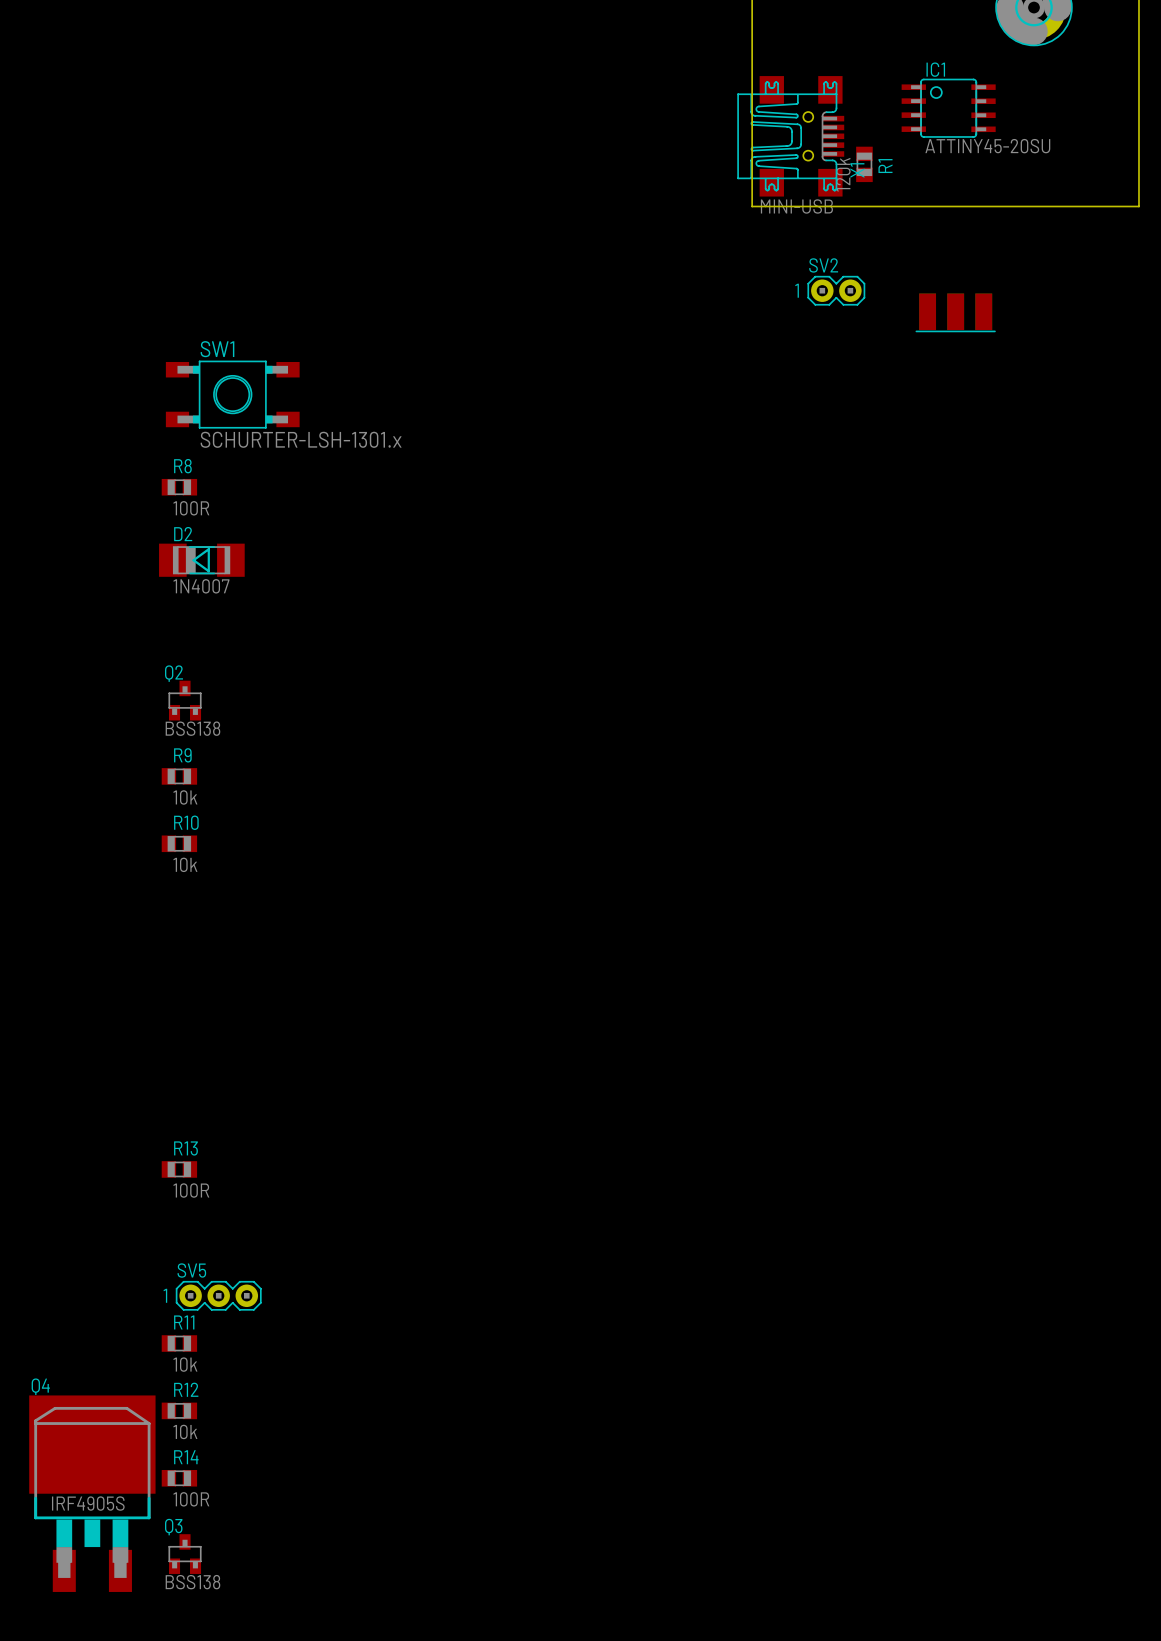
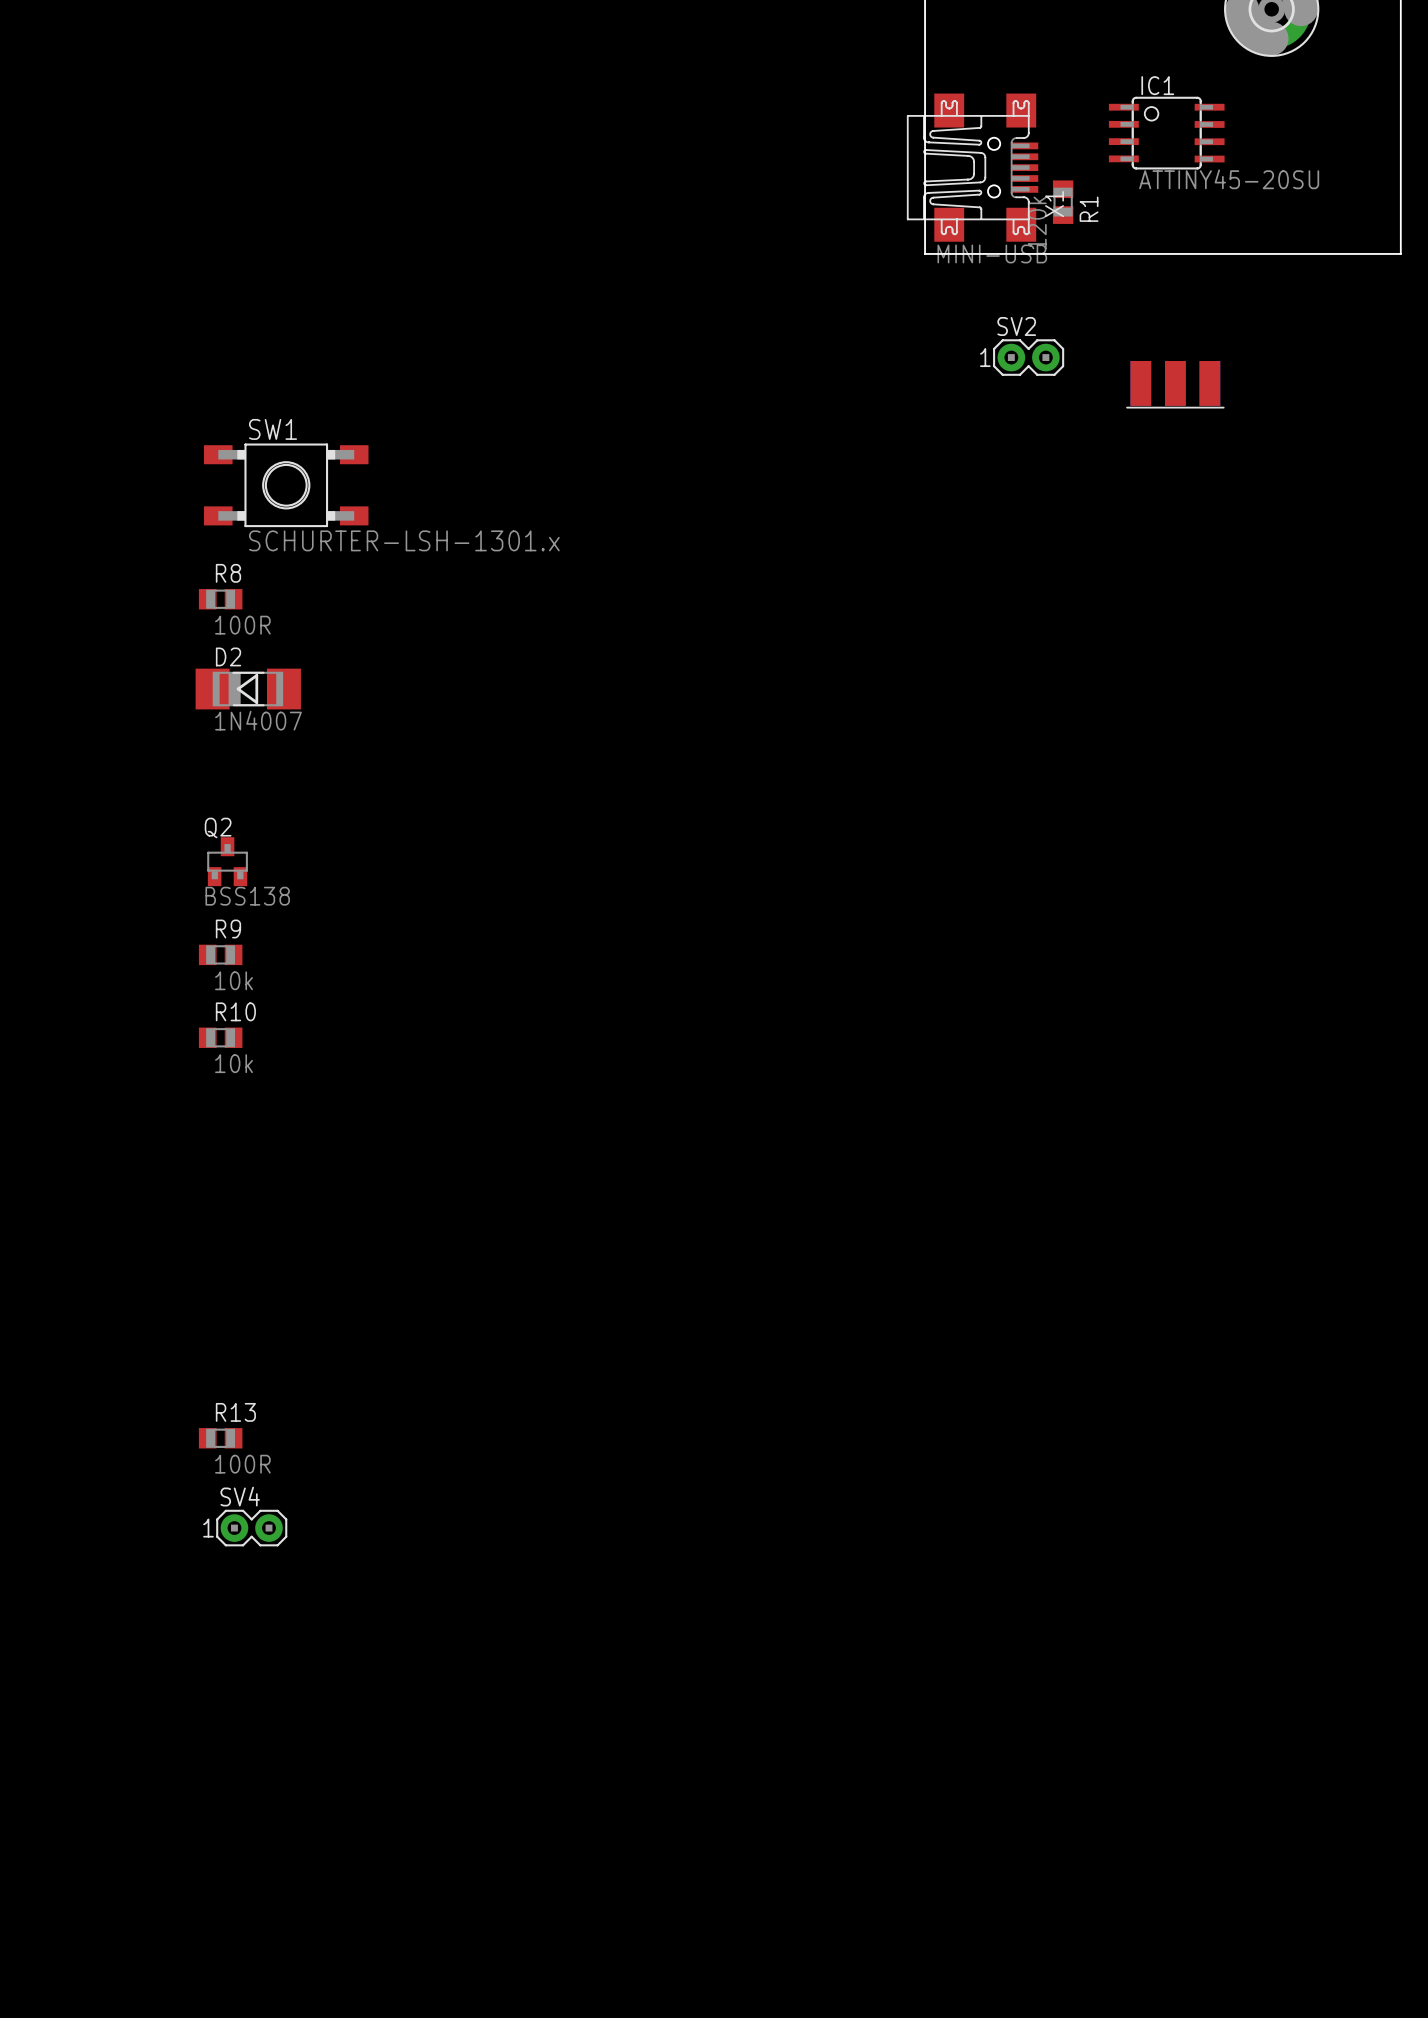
SV4: none -> (251, 1528)
SV5: (218, 1295) -> none
R11: 10k (179, 1343) -> none
R12: 10k (179, 1410) -> none
R14: 100R (179, 1478) -> none
Q4: IRF4905S (92, 1493) -> none
Q3: BSS138 (185, 1554) -> none

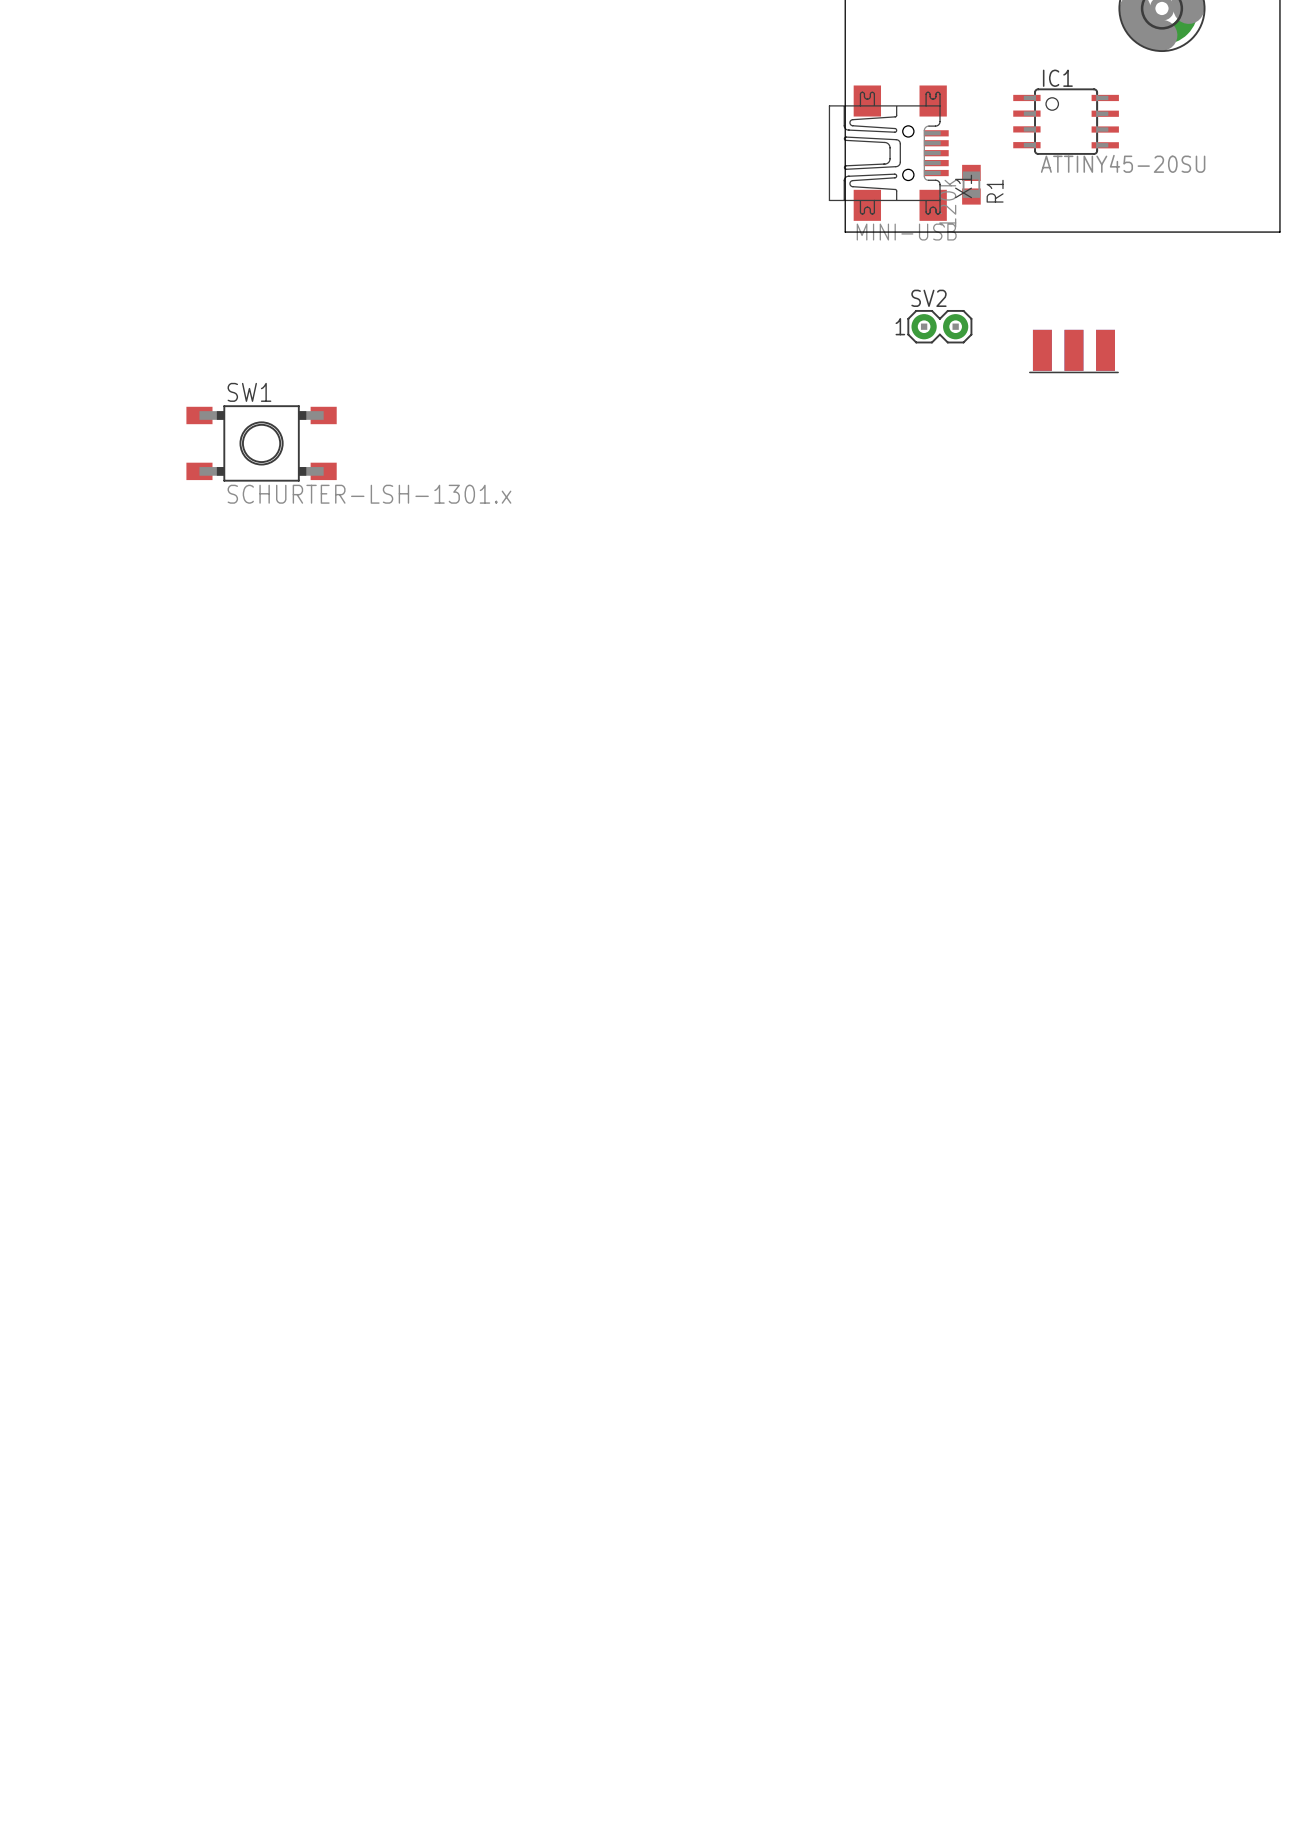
R8: 100R (220, 599) -> none
D2: 1N4007 (248, 689) -> none
Q2: BSS138 (227, 861) -> none
R9: 10k (220, 954) -> none
R10: 10k (220, 1037) -> none
R13: 100R (220, 1438) -> none
SV4: (251, 1528) -> none

